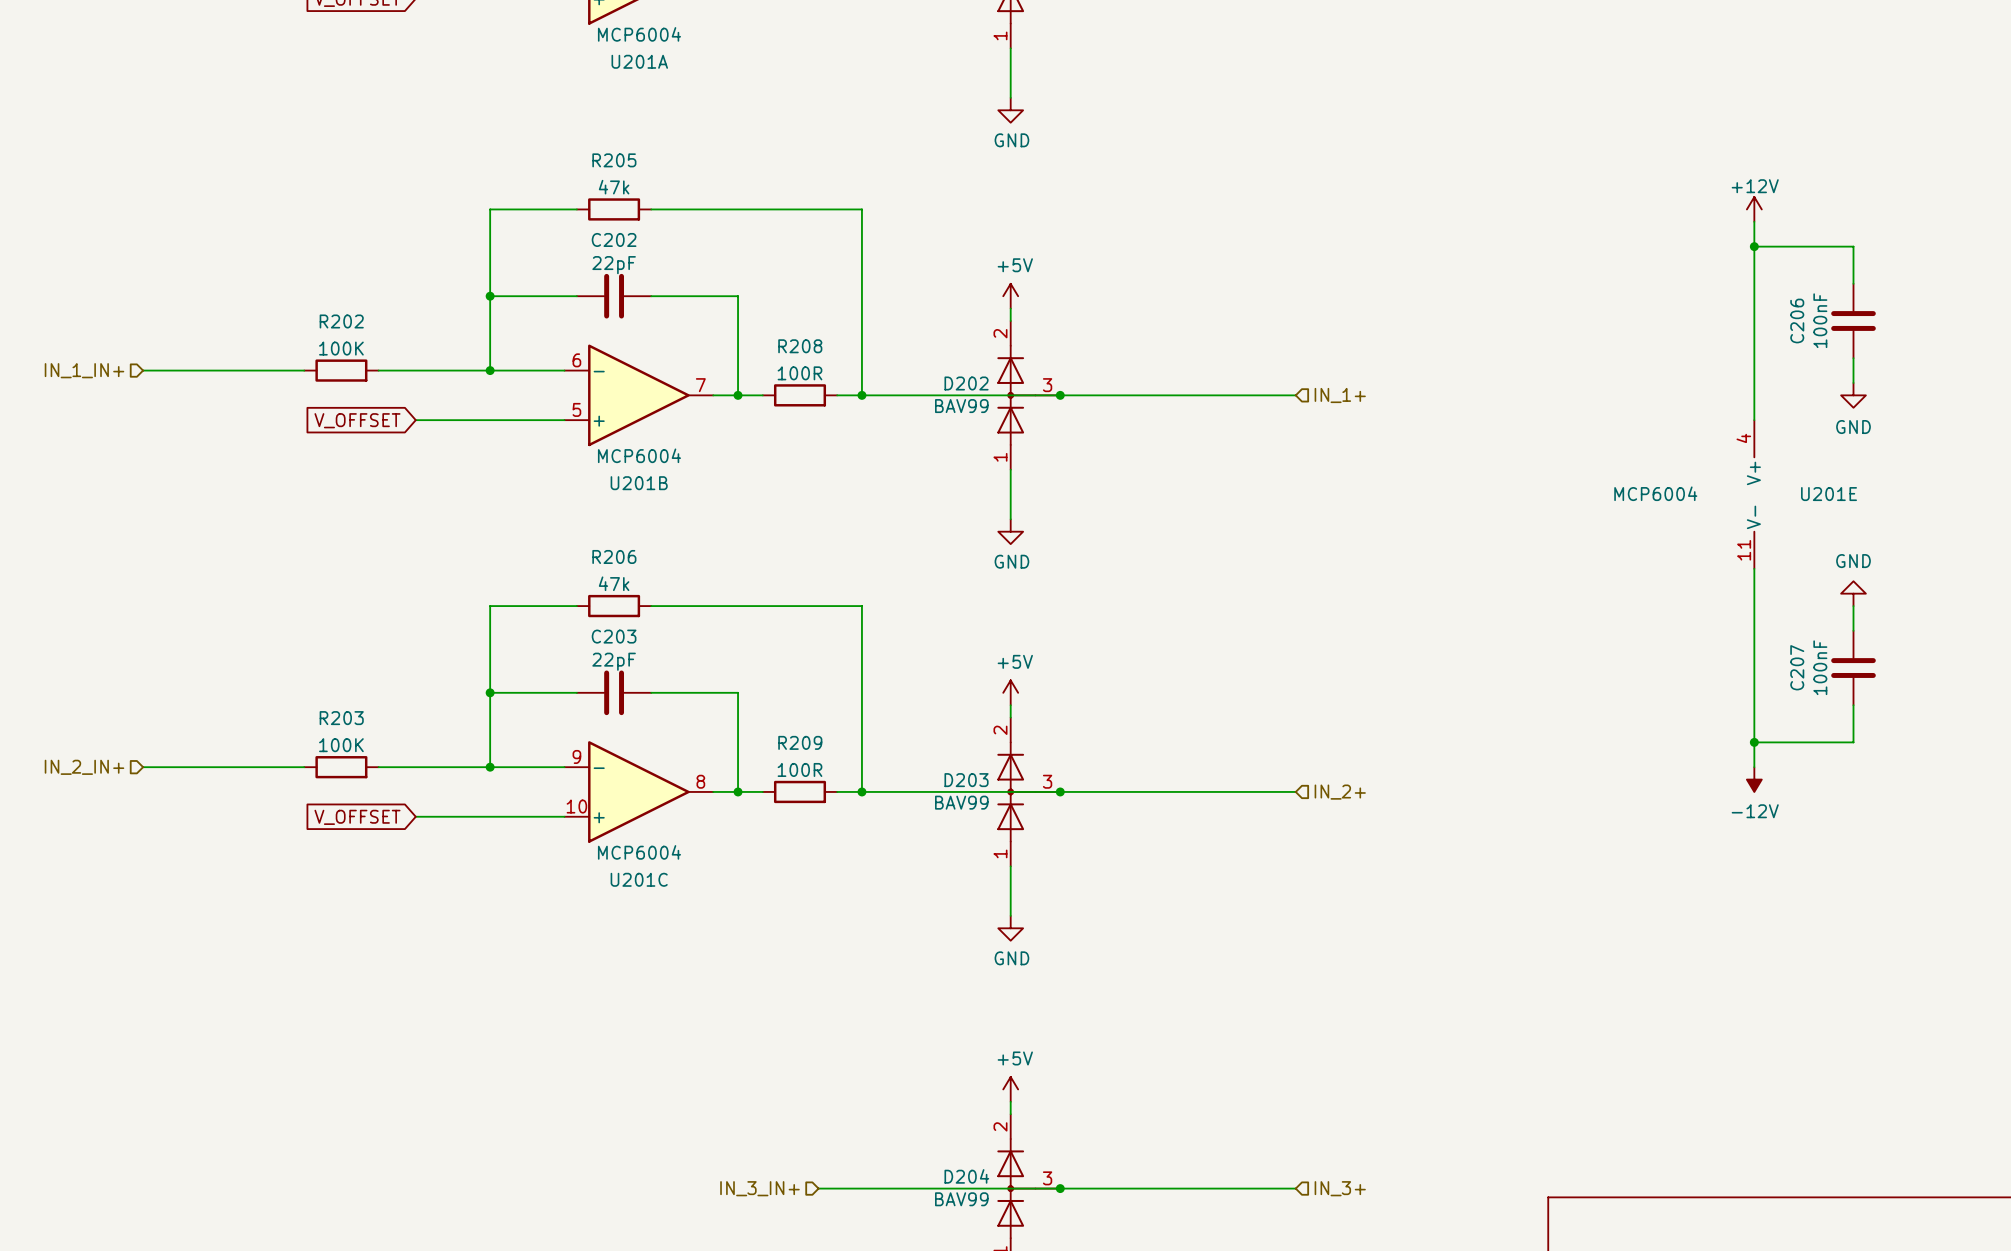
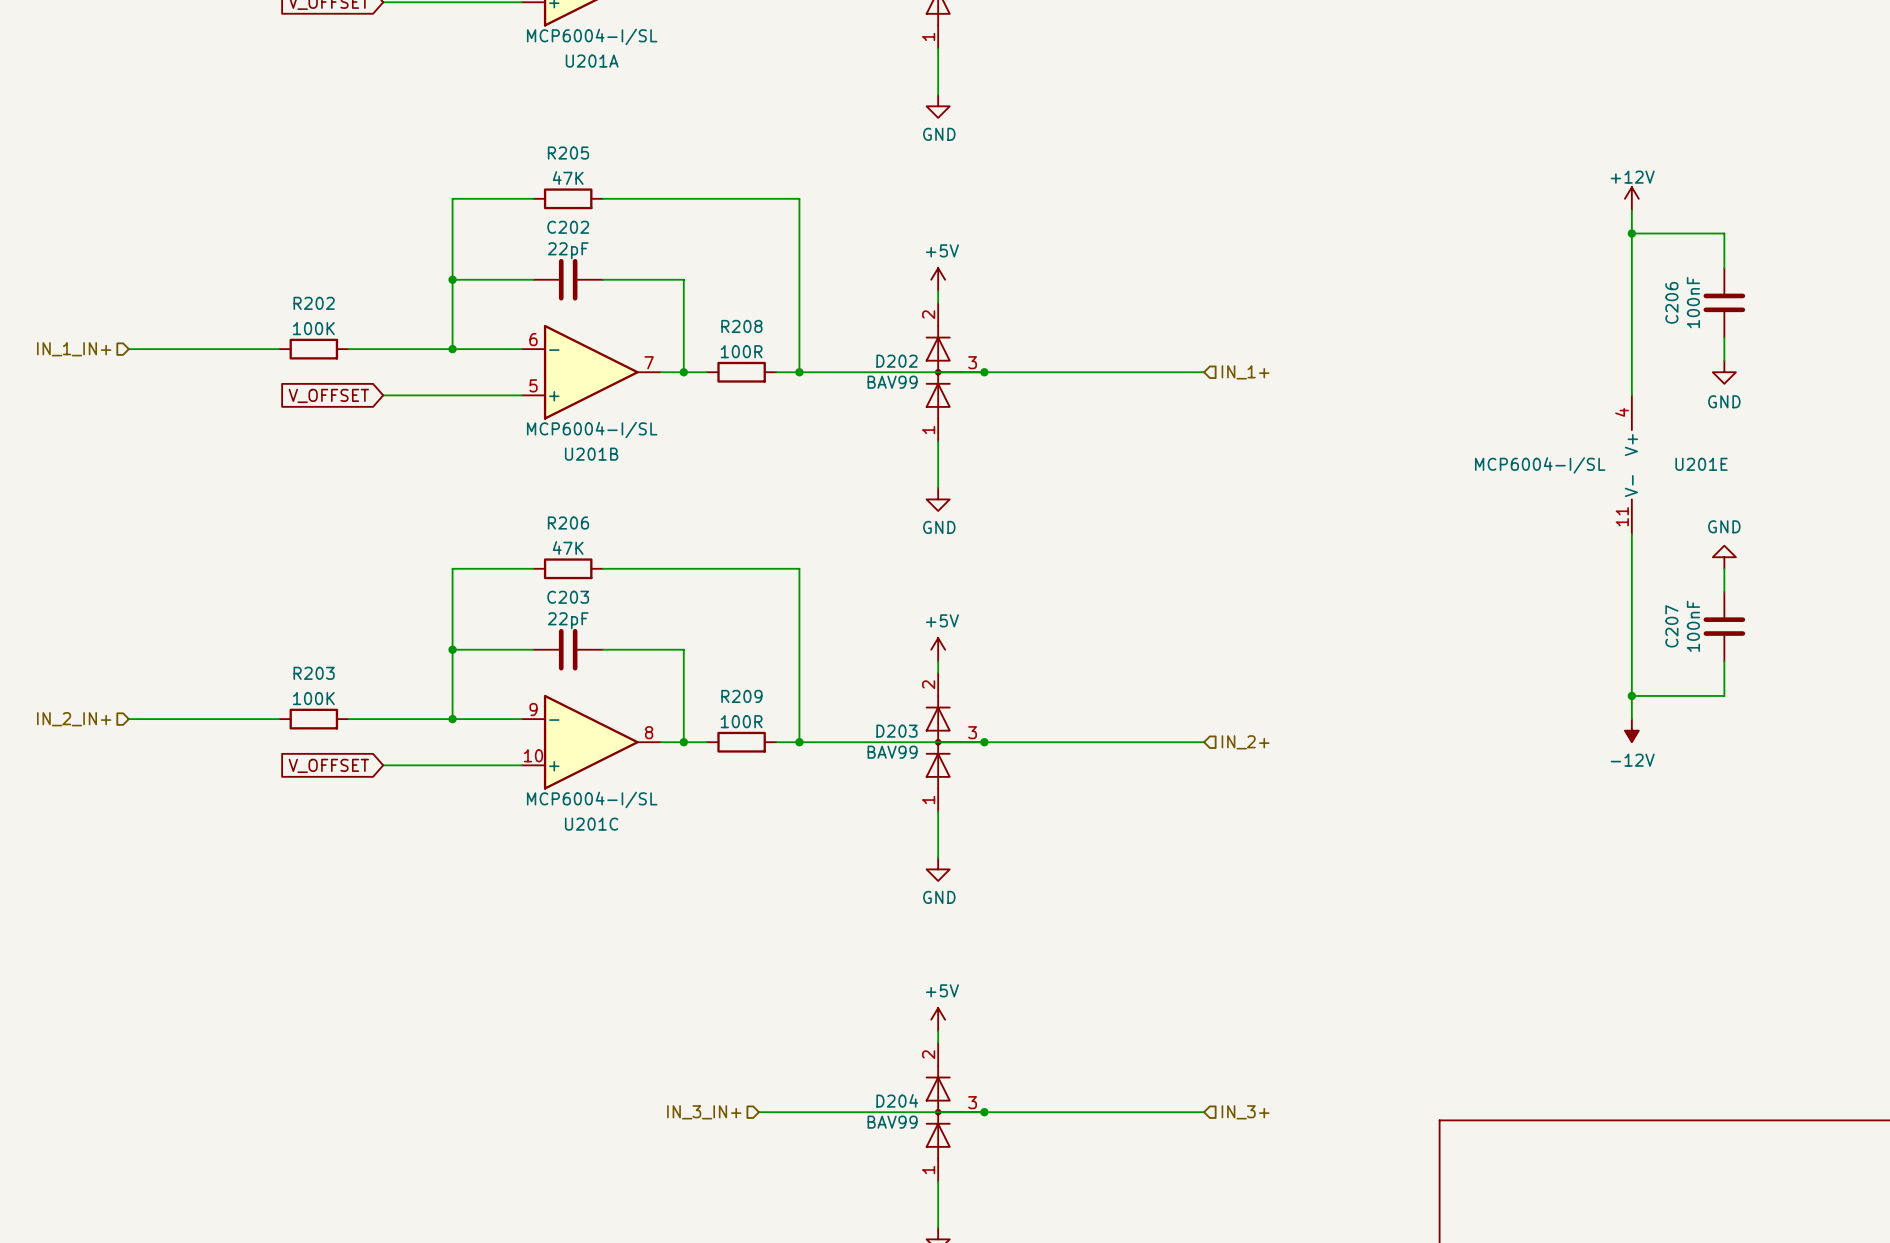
U201A value: MCP6004 (639, 34) -> MCP6004-I/SL (592, 36)
R205 value: 47k (614, 187) -> 47K (568, 178)
U201B value: MCP6004 (639, 455) -> MCP6004-I/SL (592, 430)
U201E value: MCP6004 (1655, 493) -> MCP6004-I/SL (1540, 465)
R206 value: 47k (614, 583) -> 47K (568, 547)
U201C value: MCP6004 (639, 852) -> MCP6004-I/SL (592, 799)

